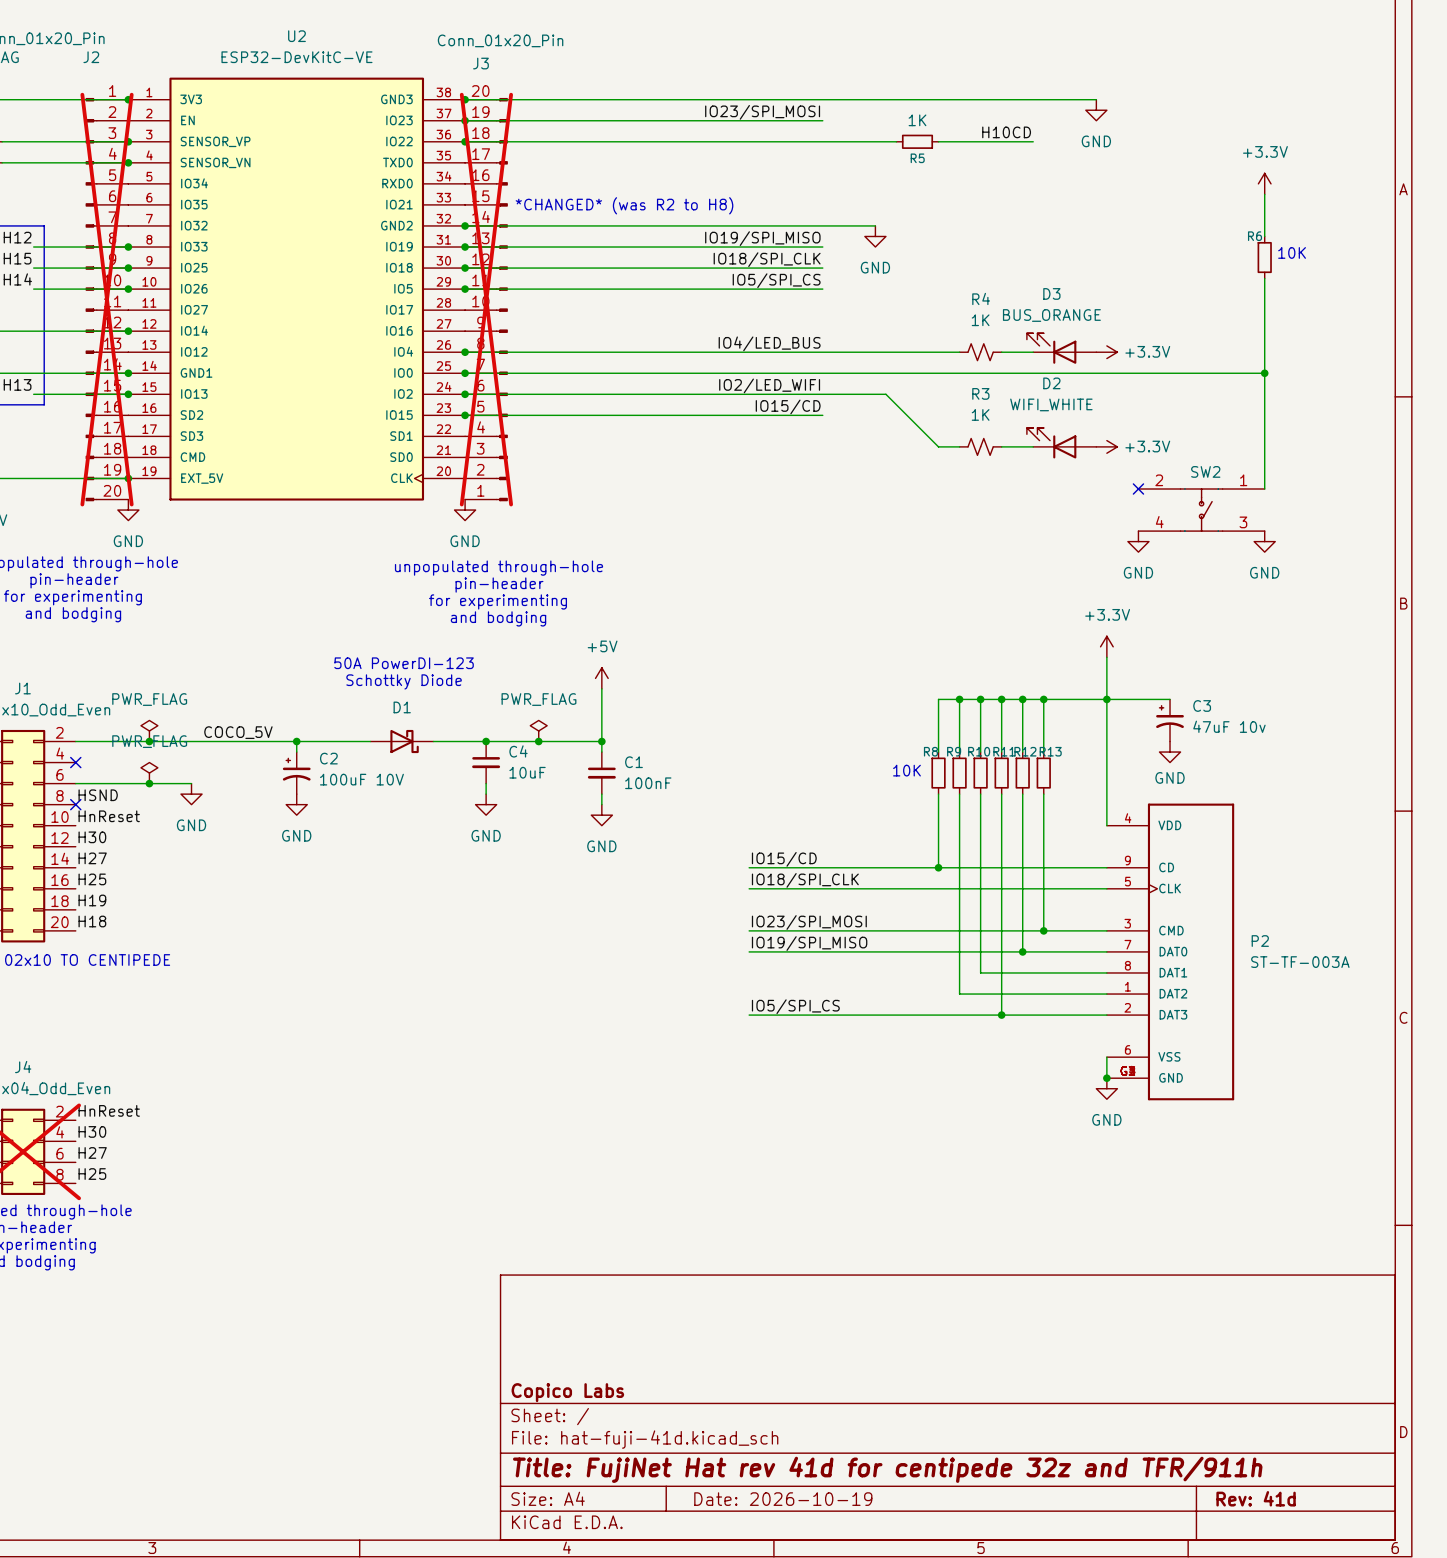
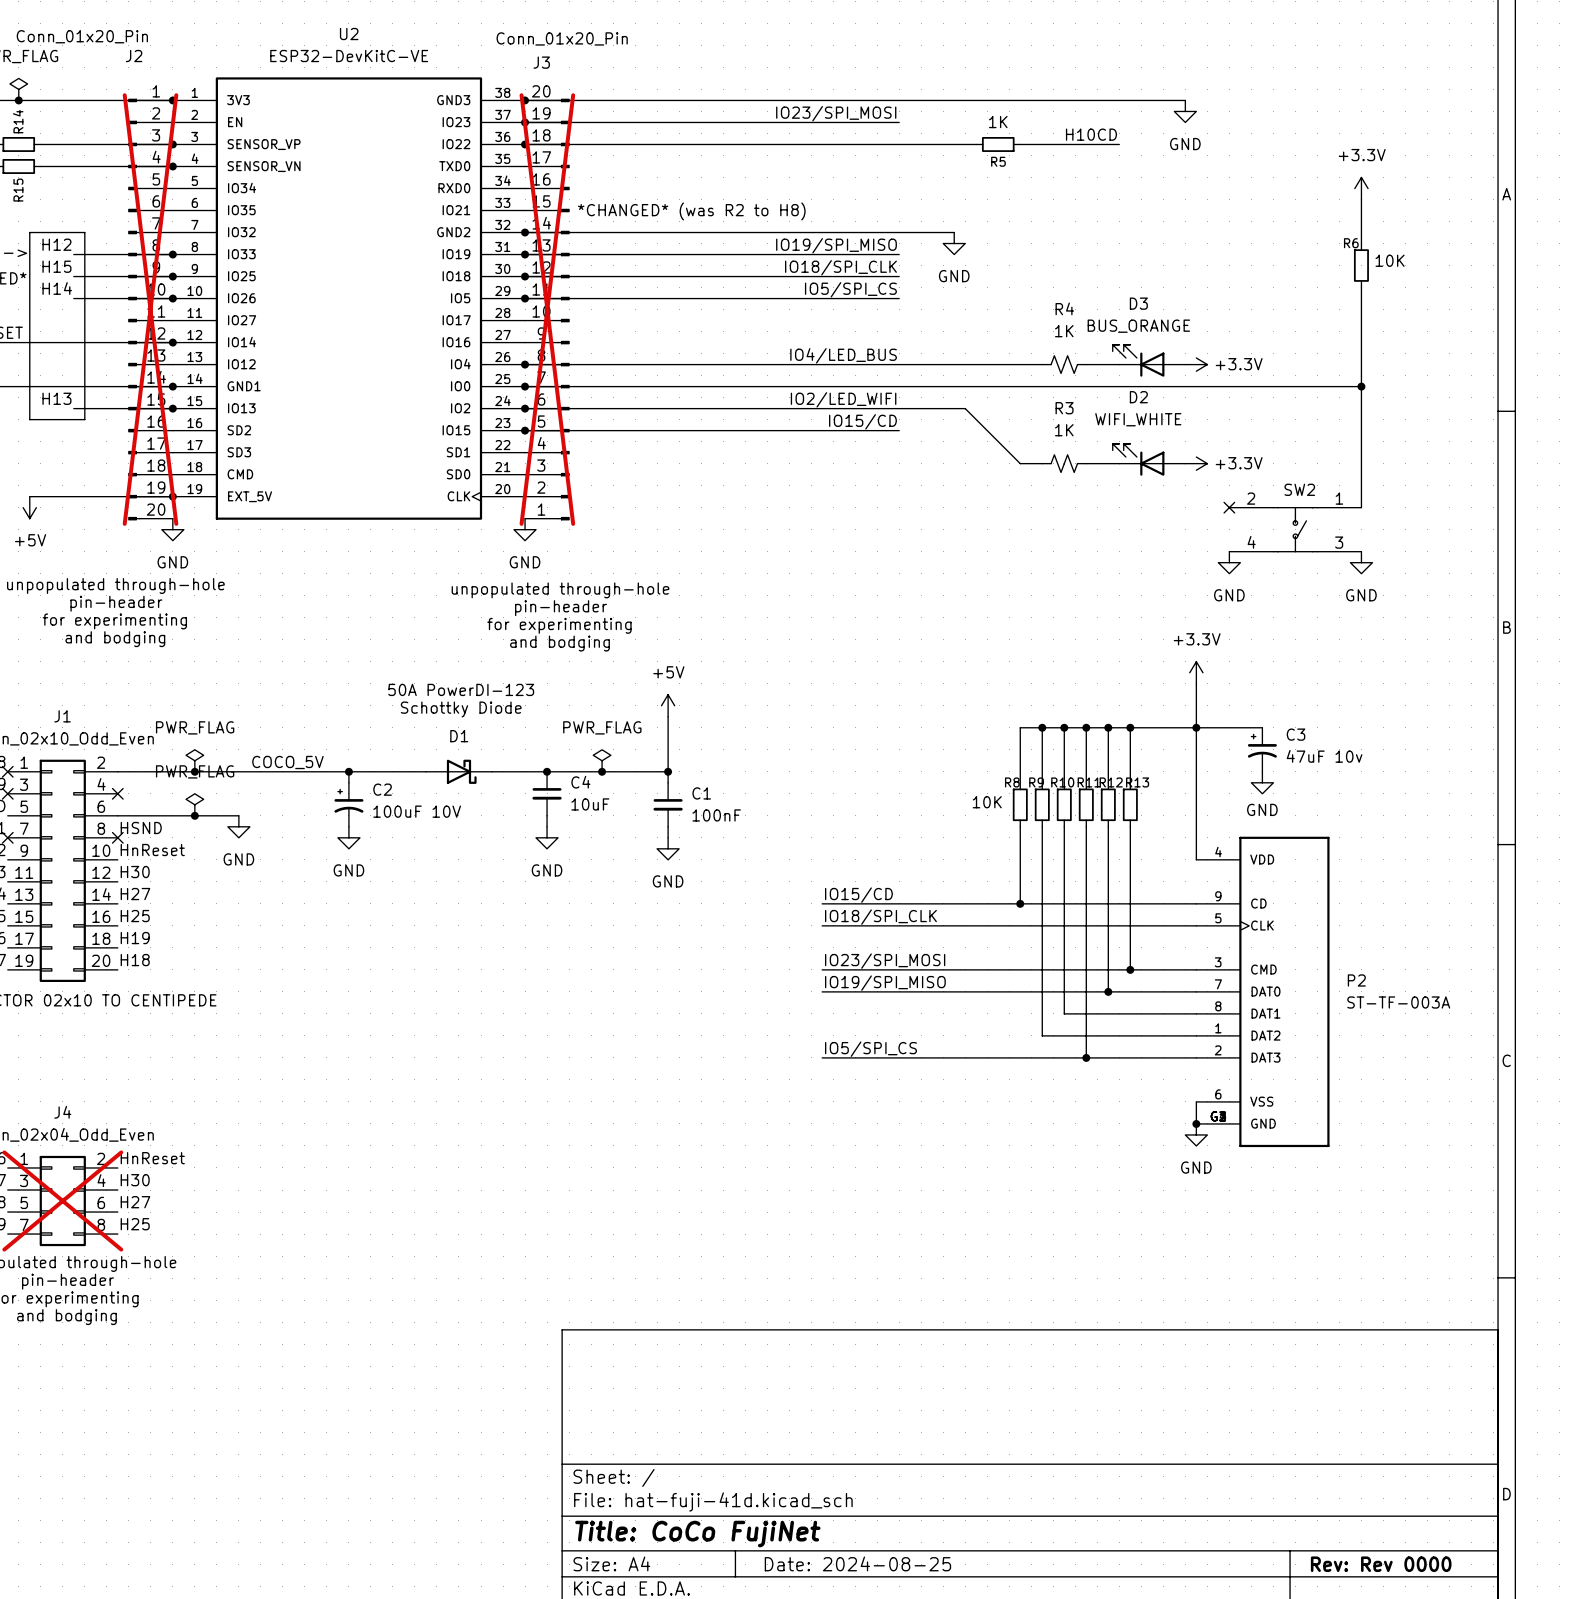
title block: Copico Labs (567, 1392) -> none
title block: Title: FujiNet Hat rev 41d for centipede 32z and TFR/911h (887, 1469) -> Title: CoCo FujiNet (697, 1534)
title block: Rev: 41d (1256, 1498) -> Rev: Rev 0000 (1381, 1564)
title block: Date: 2026-10-19 (783, 1499) -> Date: 2024-08-25 (857, 1563)

